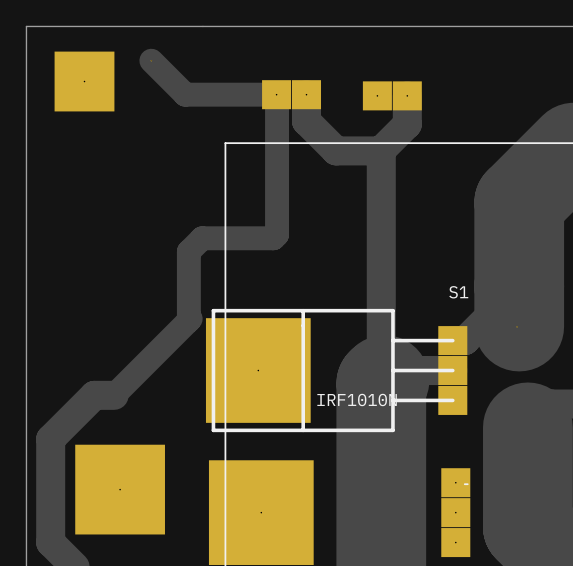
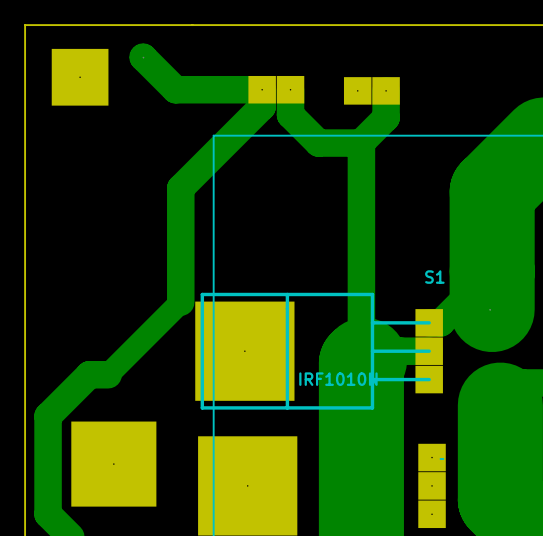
track width: thin (150, 60) (185, 94) (276, 94) -> thick (143, 57) (175, 89) (262, 89)
track: (276, 94) (277, 234) (273, 238) (202, 238) (188, 251) (188, 320) -> (262, 89) (262, 106) (180, 188) (180, 302)

